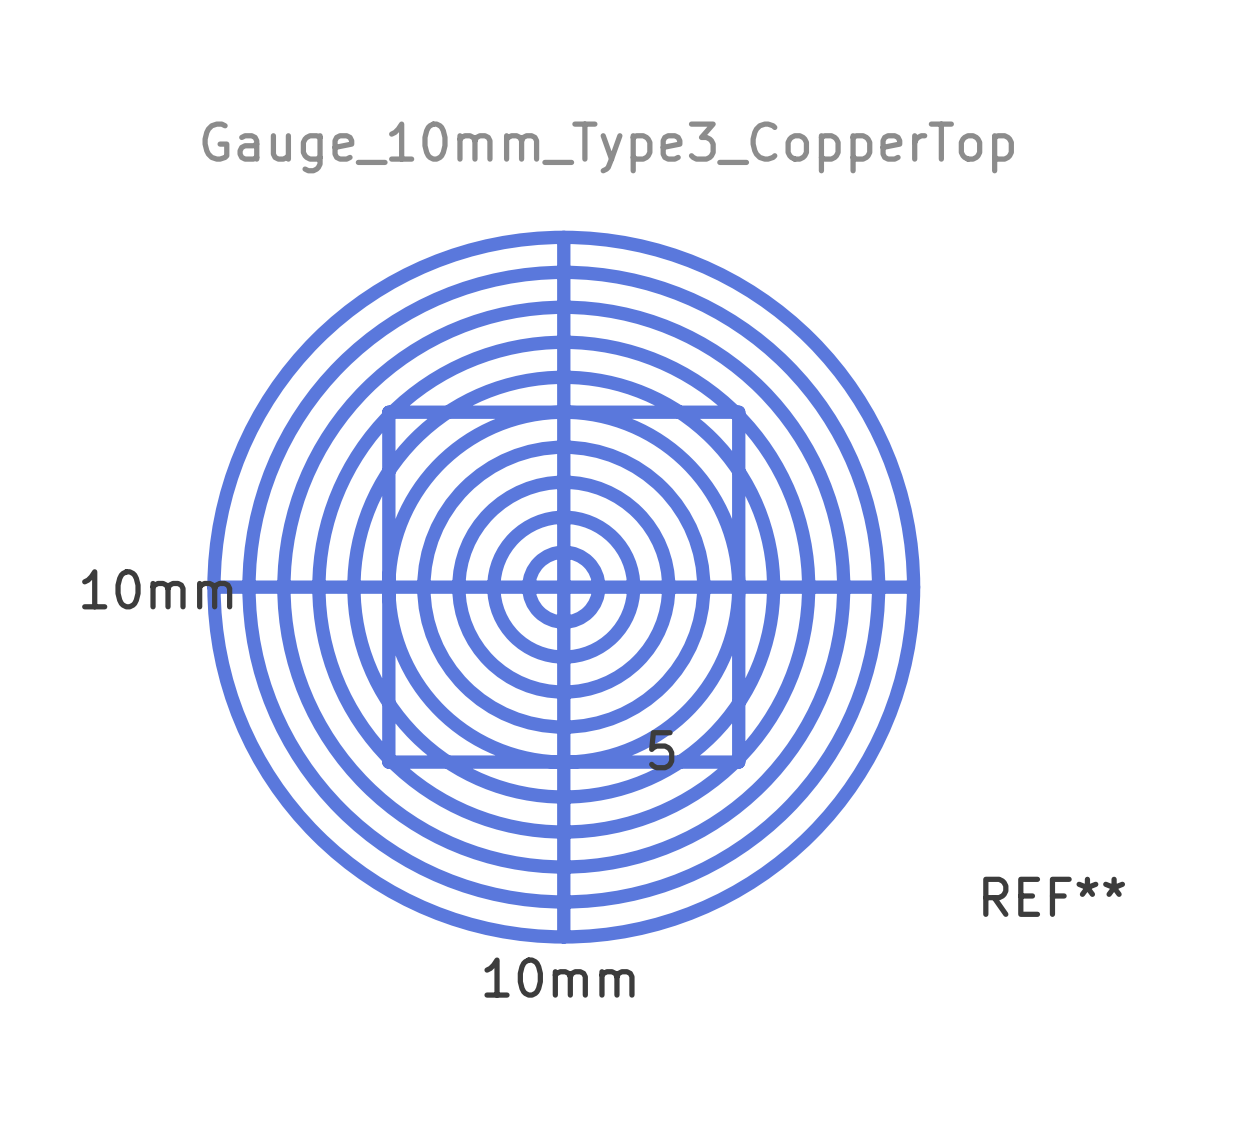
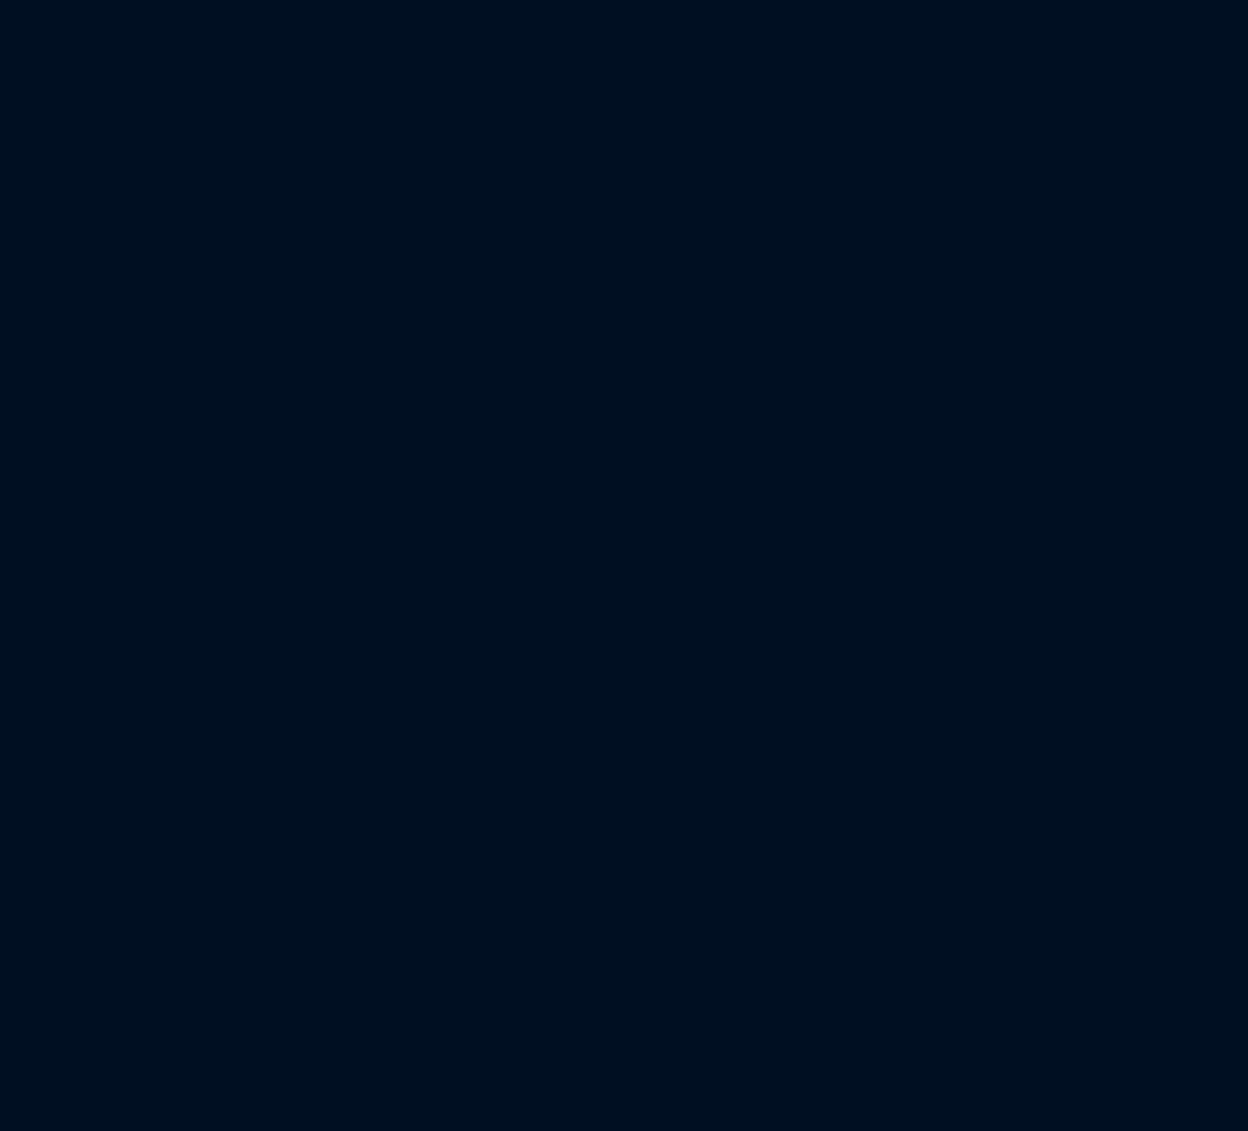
REF**: Gauge_10mm_Type3_CopperTop (563, 587) -> none

